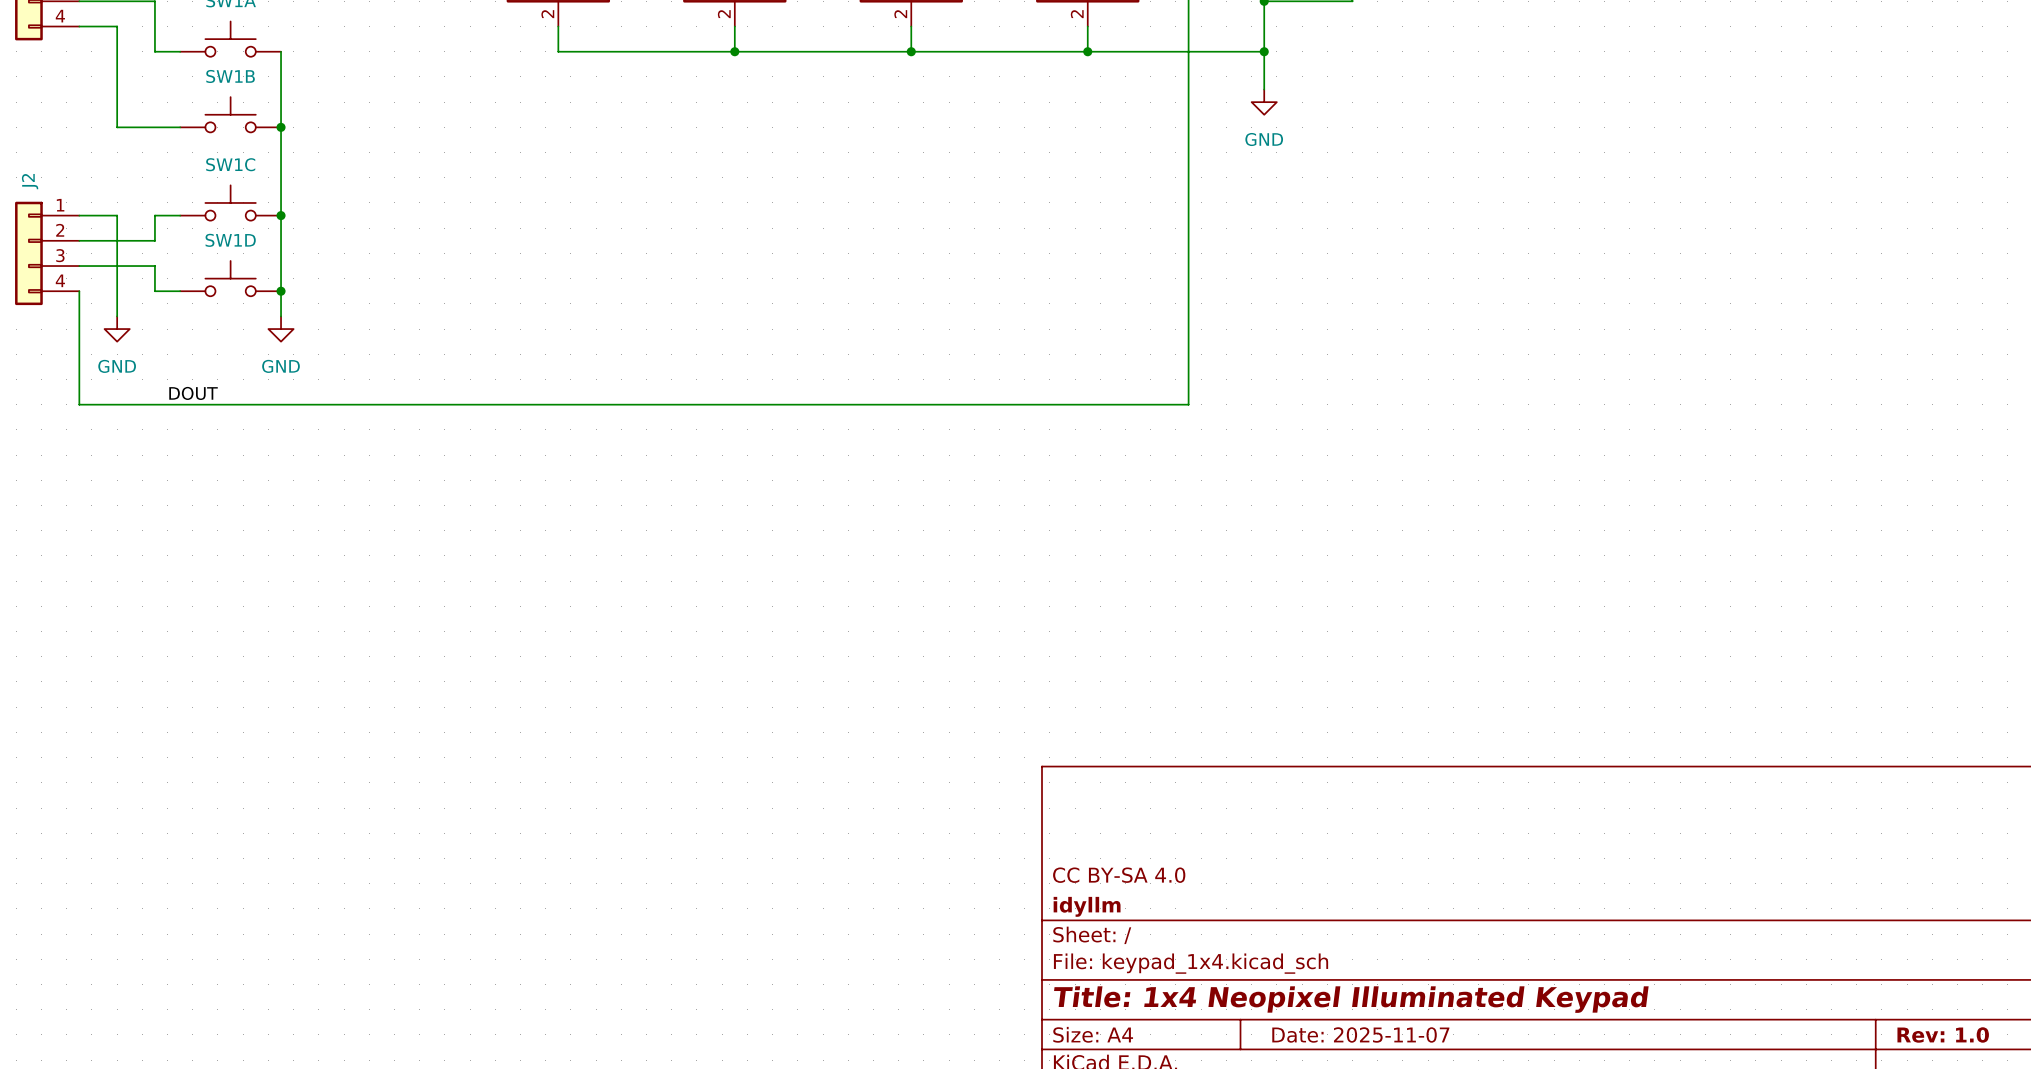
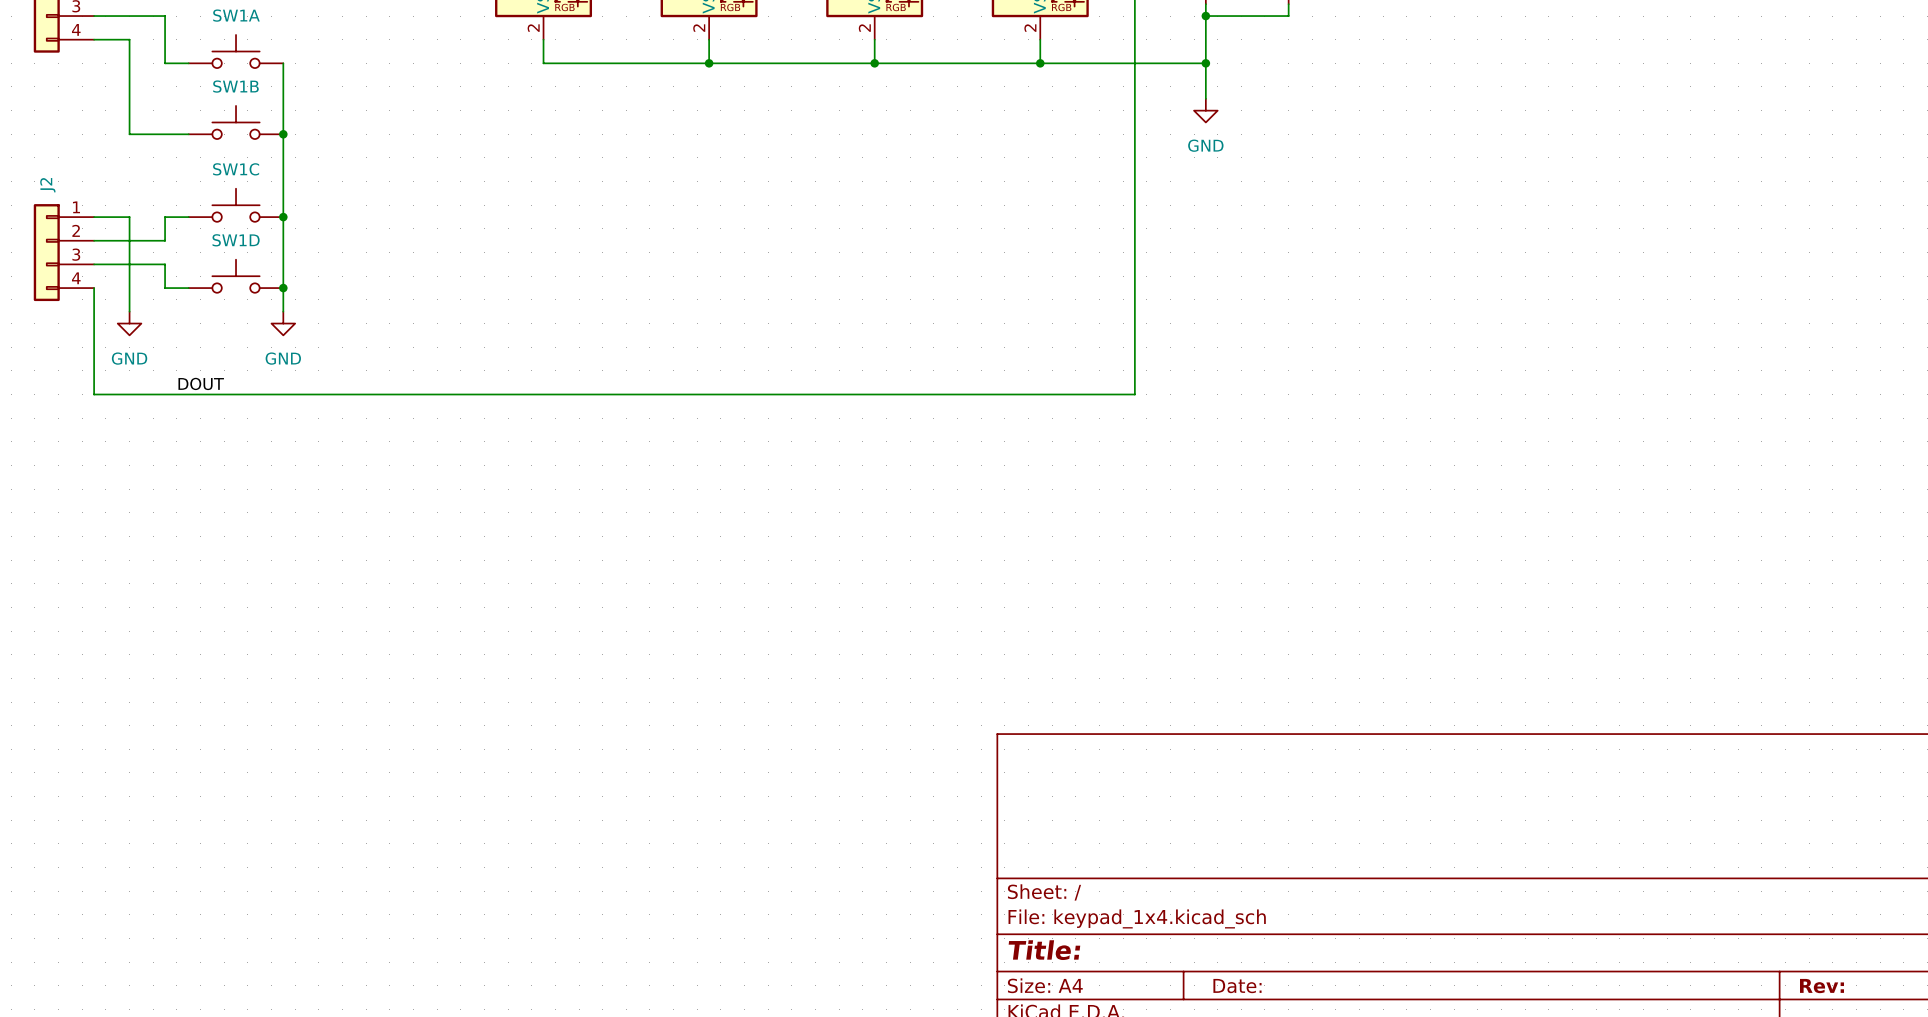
title block: CC BY-SA 4.0 (1119, 875) -> none
title block: idyllm (1087, 906) -> none
title block: Title: 1x4 Neopixel Illuminated Keypad (1351, 999) -> Title: (1044, 950)
title block: Date: 2025-11-07 (1360, 1034) -> Date: (1237, 986)
title block: Rev: 1.0 (1943, 1034) -> Rev: (1822, 986)

